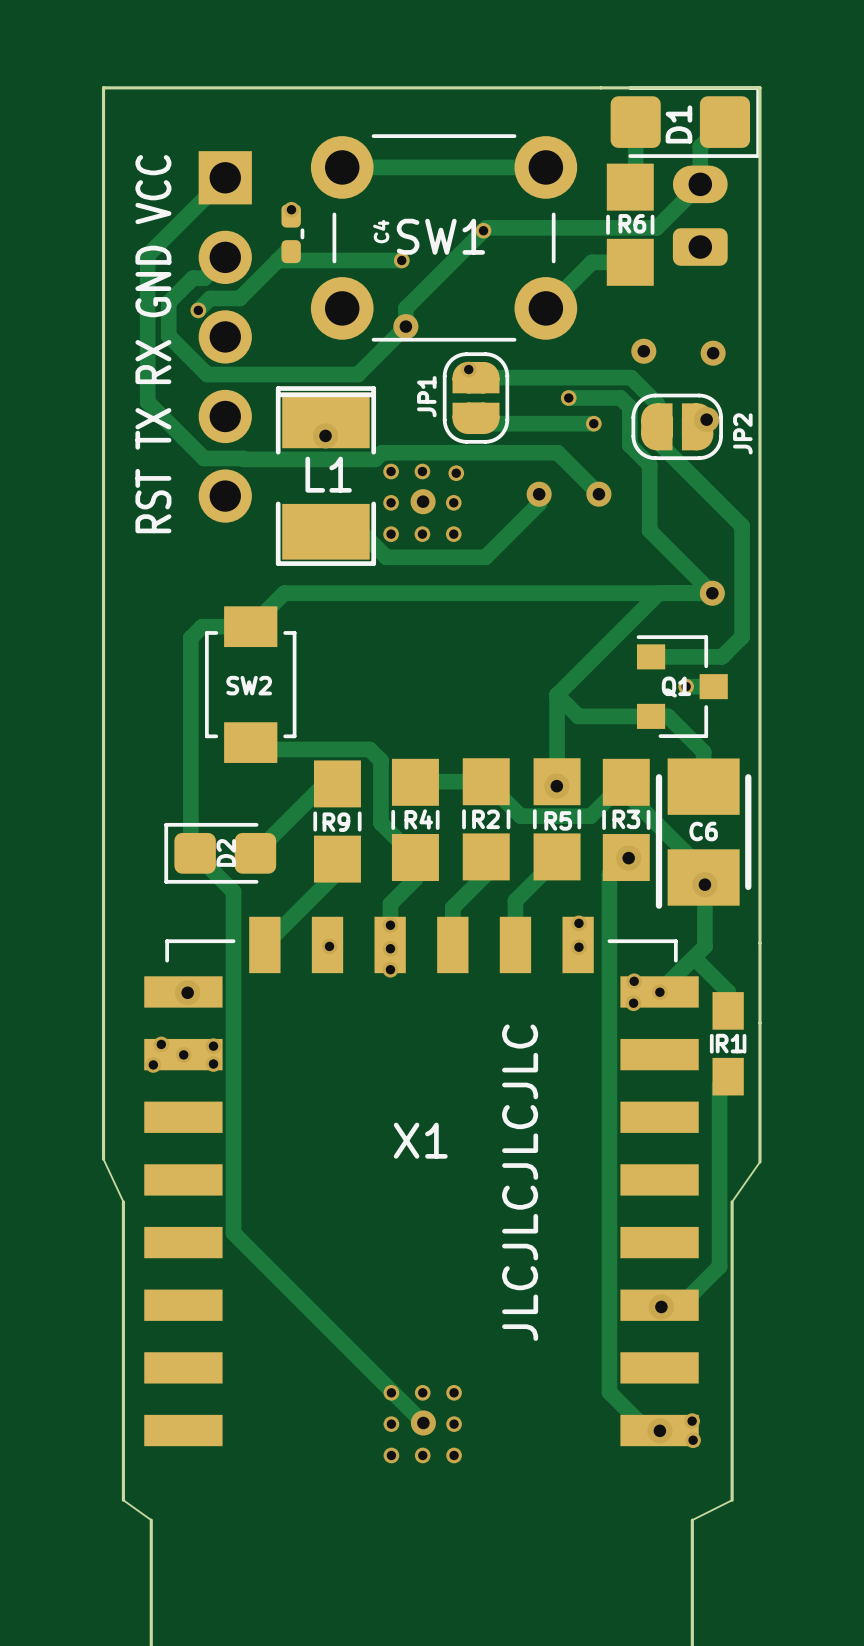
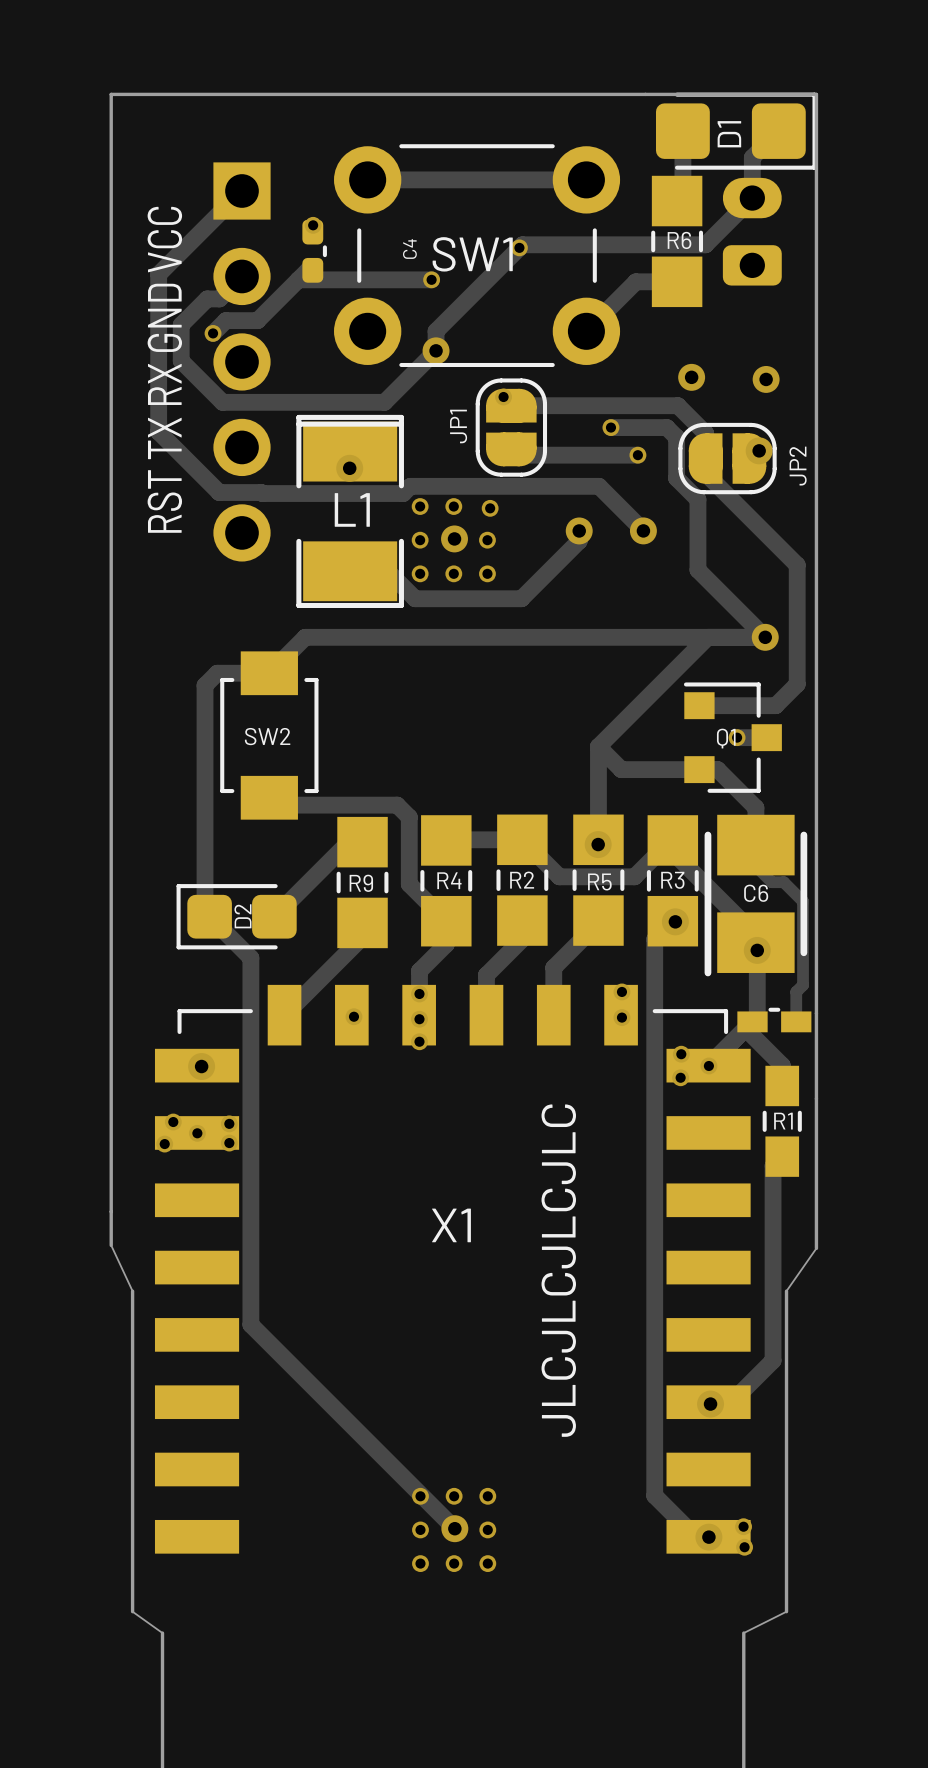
track: none -> (755, 841) (755, 866) (771, 882) (783, 882) (803, 901) (803, 985) (796, 991) (796, 1021)
part: none -> (774, 1020)

